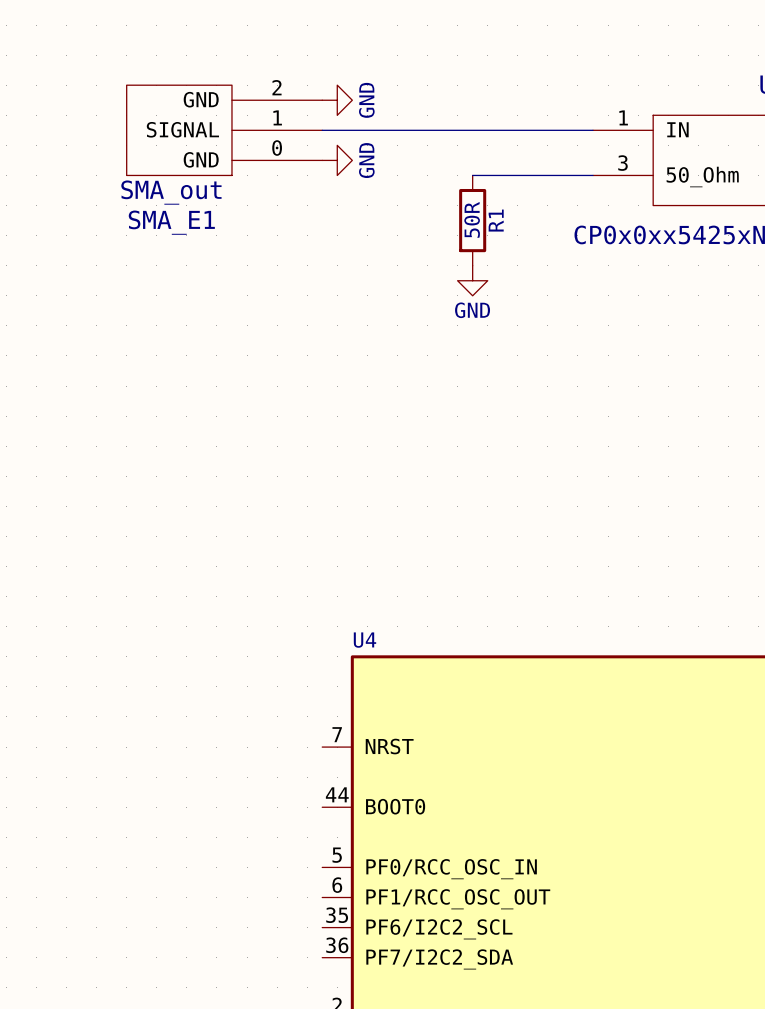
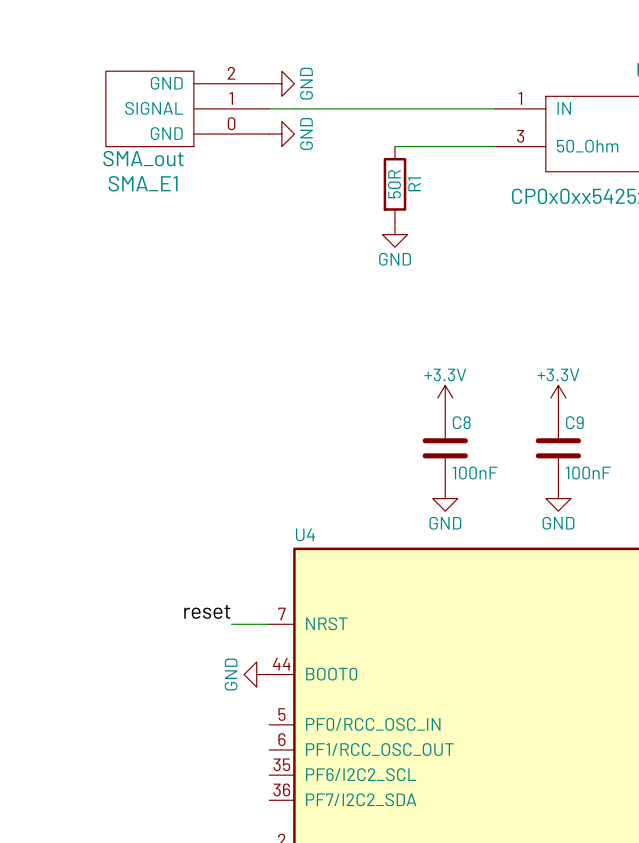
power symbol: none -> +3.3V (445, 398)
power symbol: none -> +3.3V (558, 398)
C8: none -> 100nF (445, 448)
C9: none -> 100nF (558, 448)
power symbol: none -> GND (445, 498)
power symbol: none -> GND (558, 498)
label: none -> reset (207, 611)
wire: none -> (231, 624) (269, 624)
power symbol: none -> GND (256, 674)

